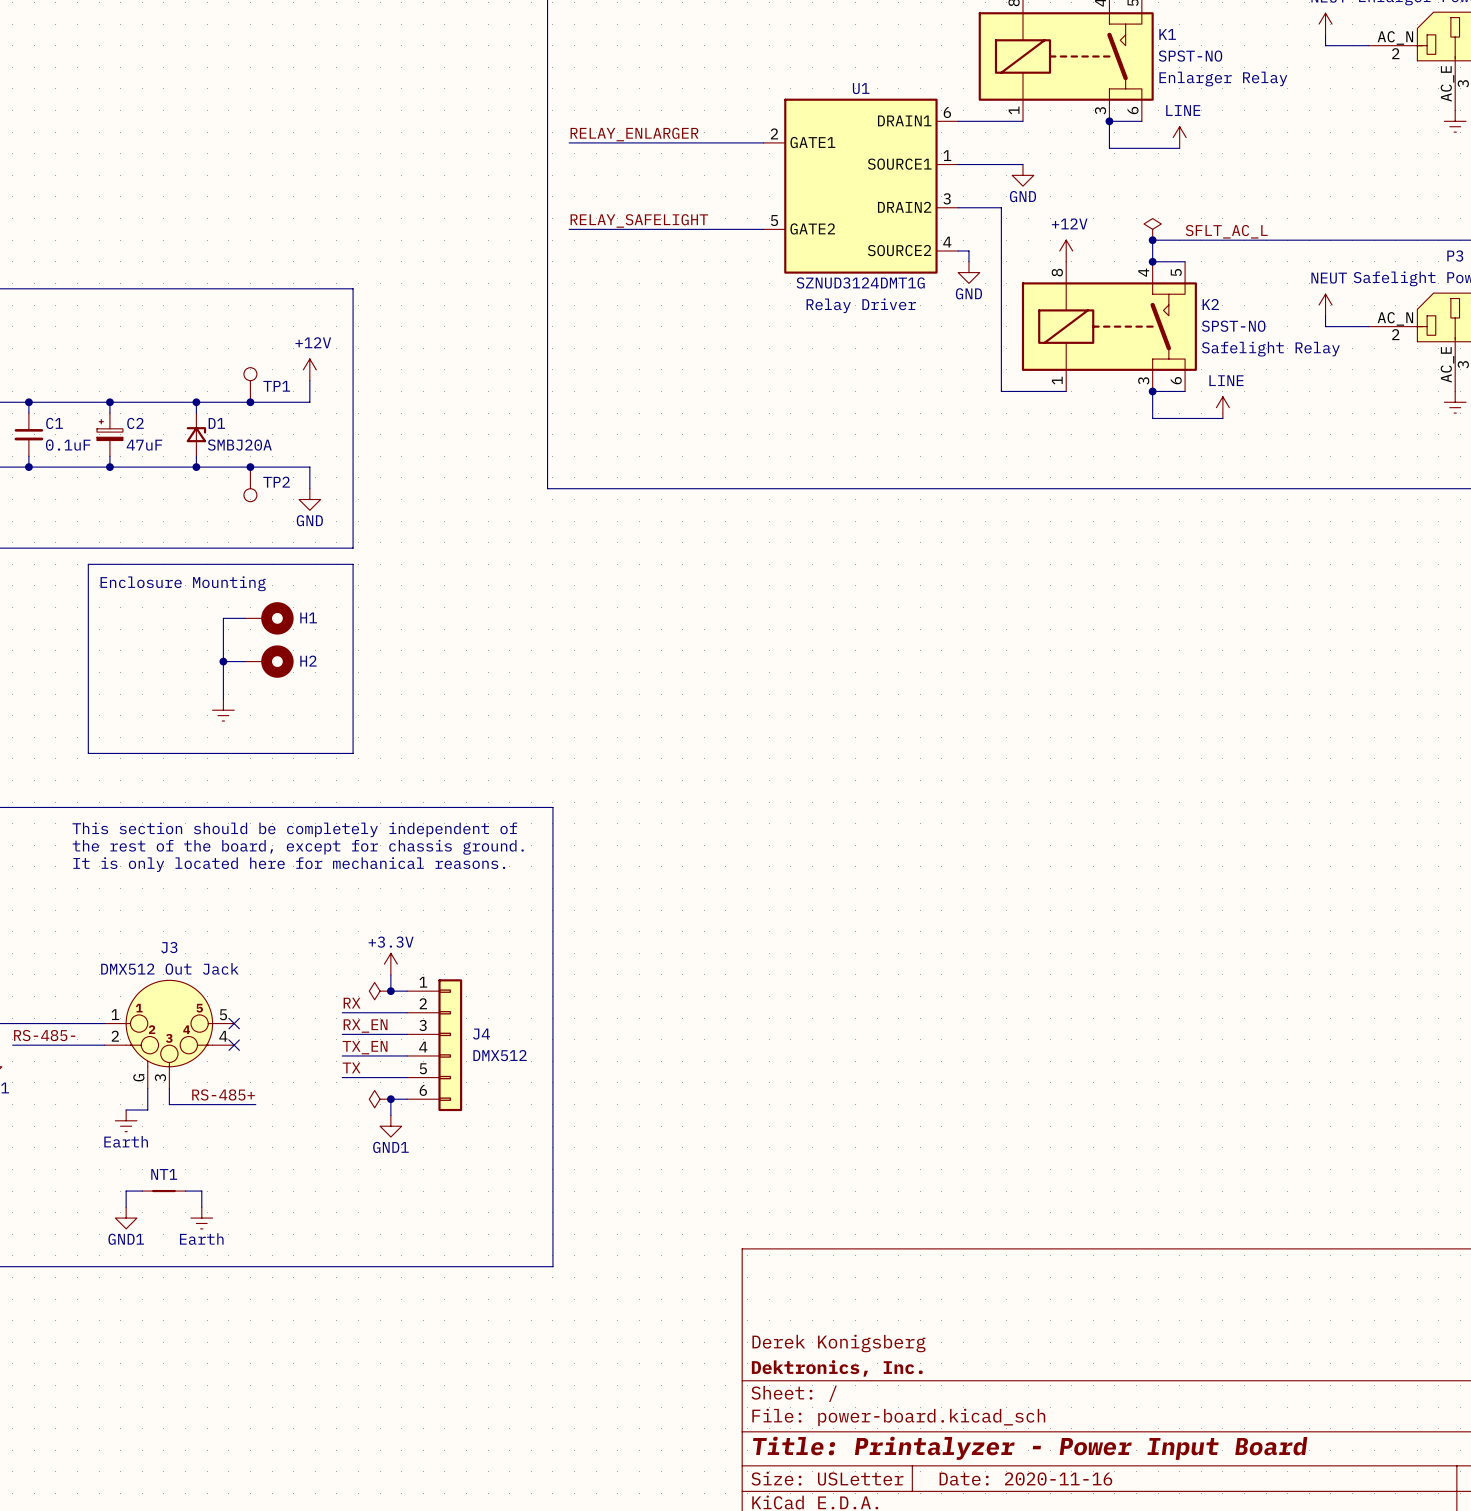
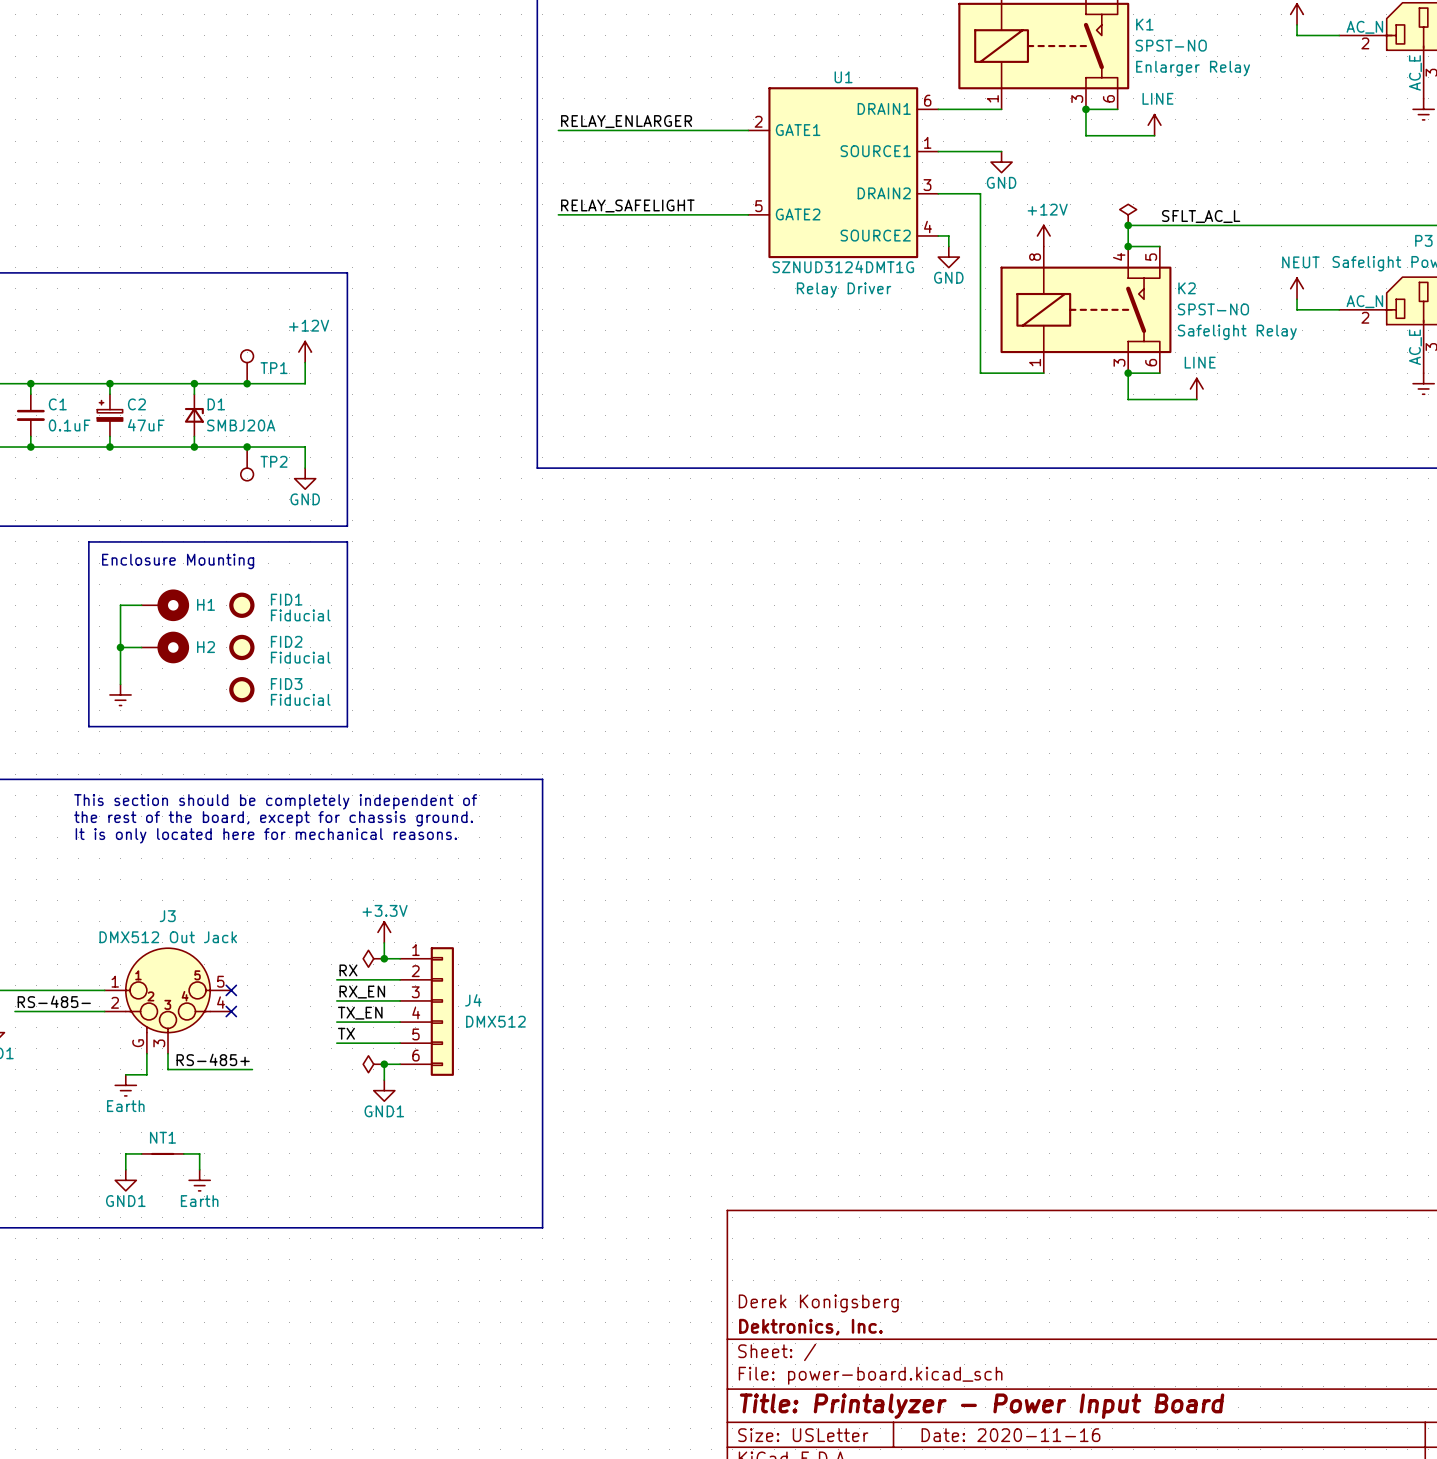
wire: (245, 618) (223, 618) (223, 699) -> (141, 605) (120, 605) (120, 684)
H1 position: (269, 618) -> (165, 605)
FID1: none -> Fiducial (241, 605)
wire: (223, 661) (245, 661) -> (120, 647) (141, 647)
junction: (223, 661) -> none
H2 position: (269, 661) -> (165, 647)
junction: none -> (120, 647)
FID2: none -> Fiducial (241, 647)
power symbol position: (223, 710) -> (120, 694)
FID3: none -> Fiducial (241, 689)

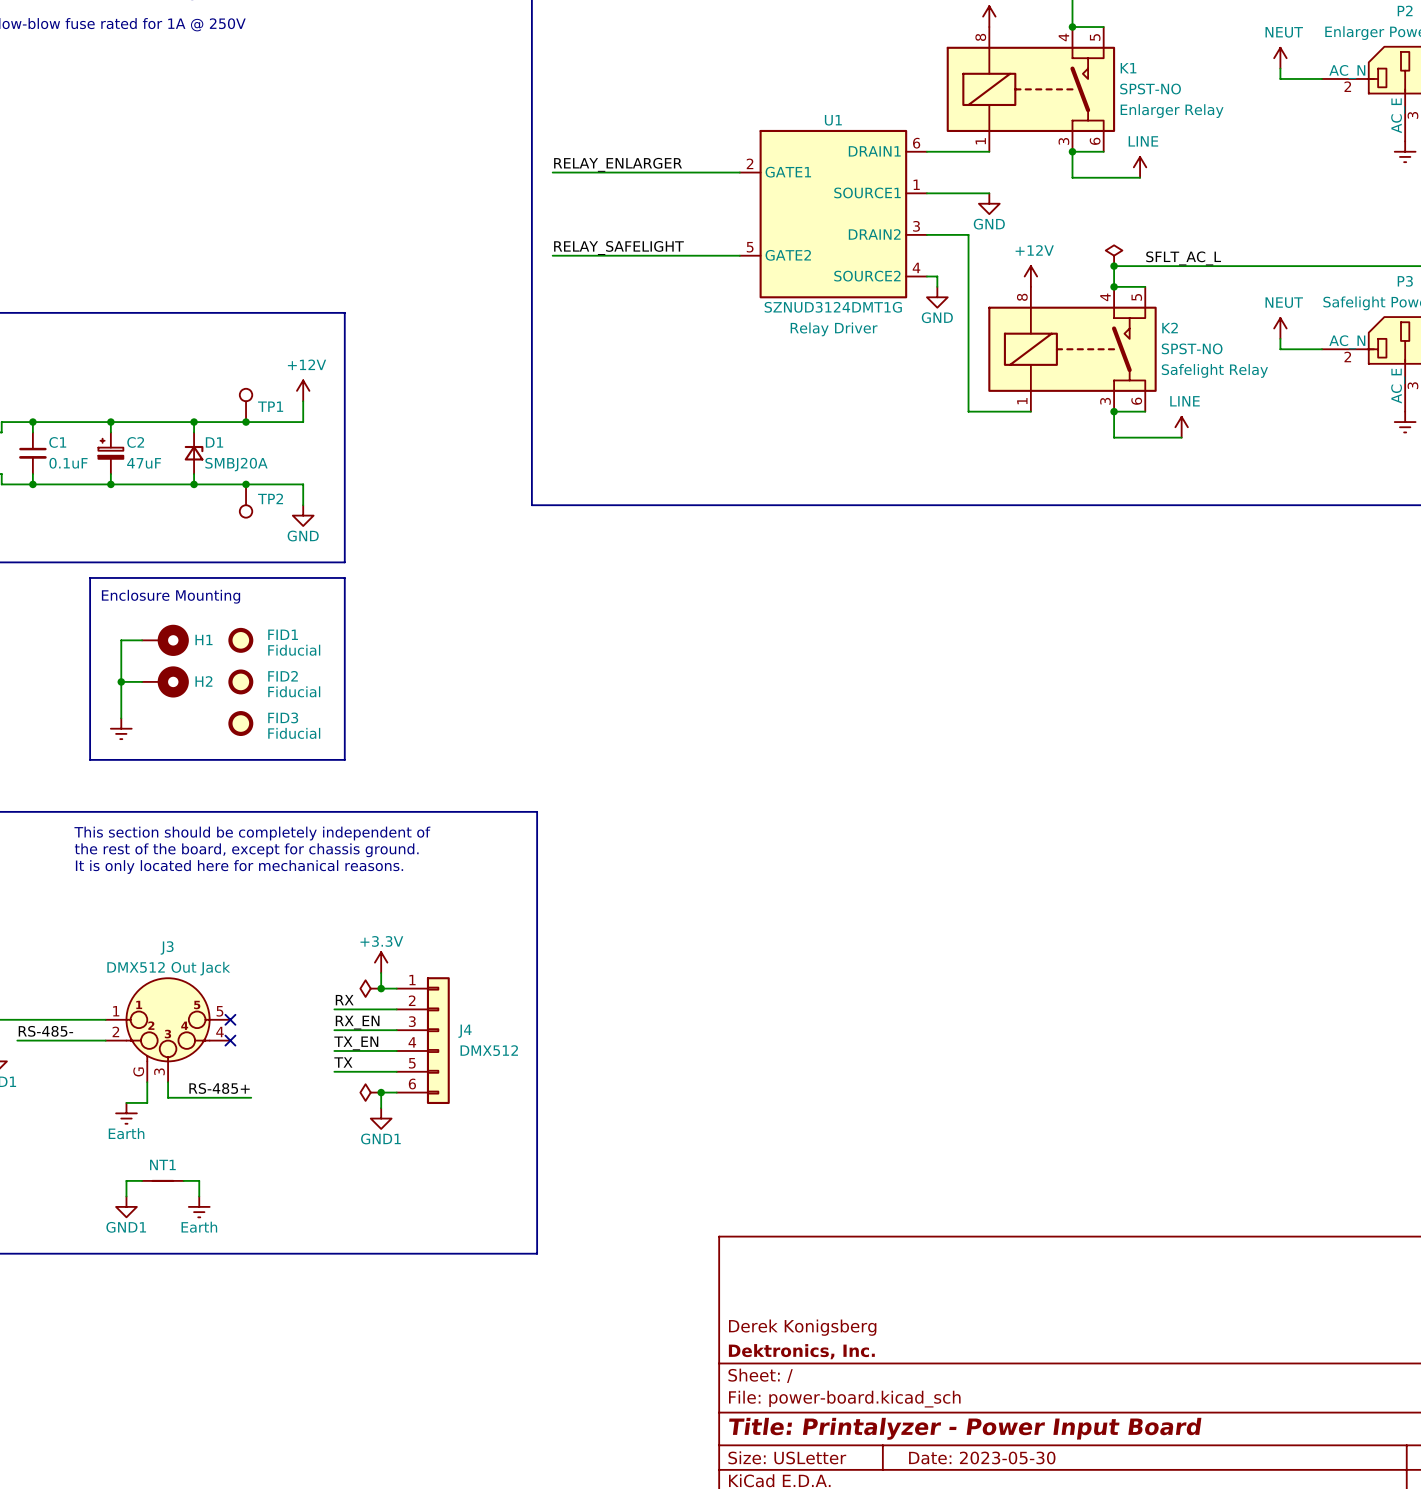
title block: Date: 2020-11-16 (1010, 1435) -> Date: 2023-05-30 (982, 1457)

